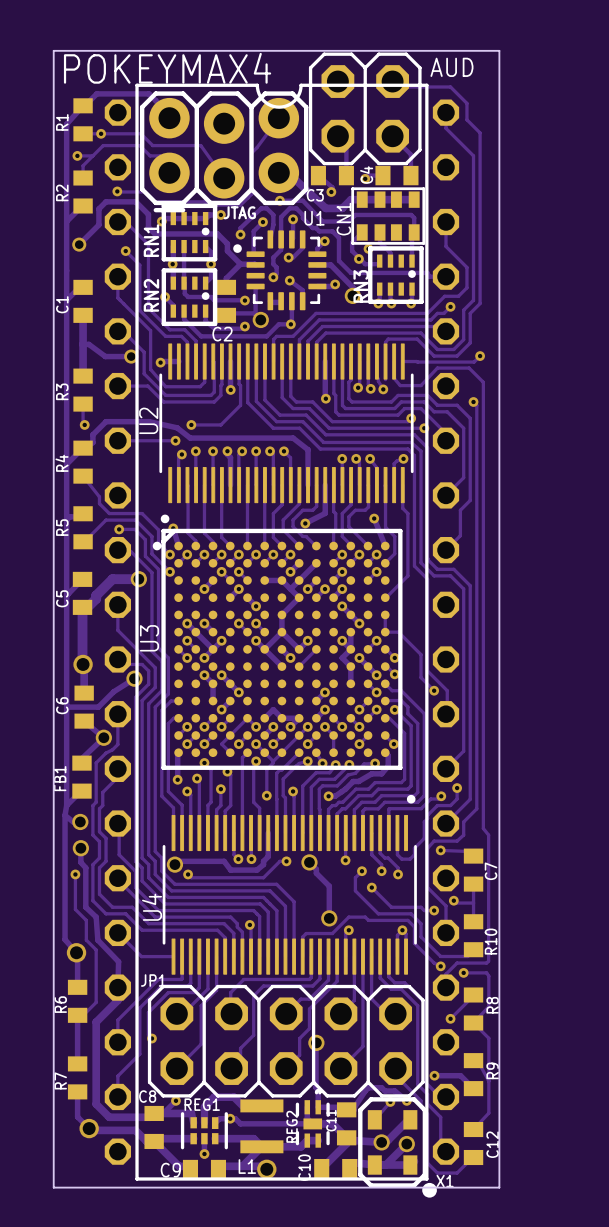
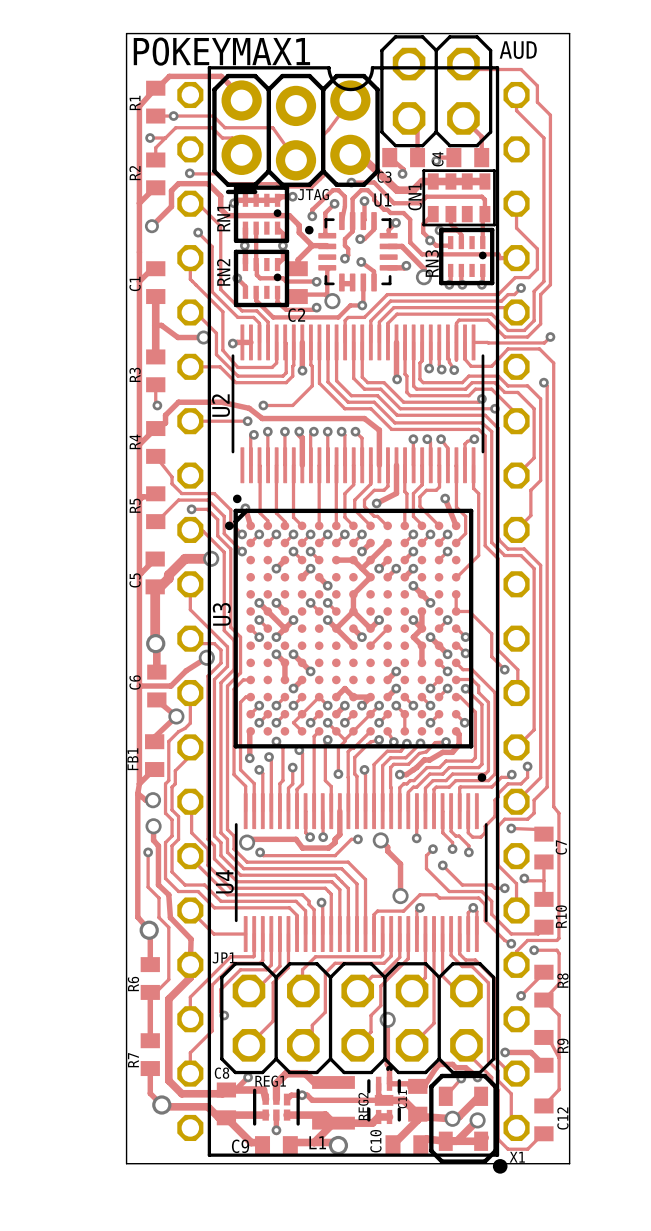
POKEYMAX4 name: POKEYMAX4 (167, 68) -> POKEYMAX1 (221, 51)

